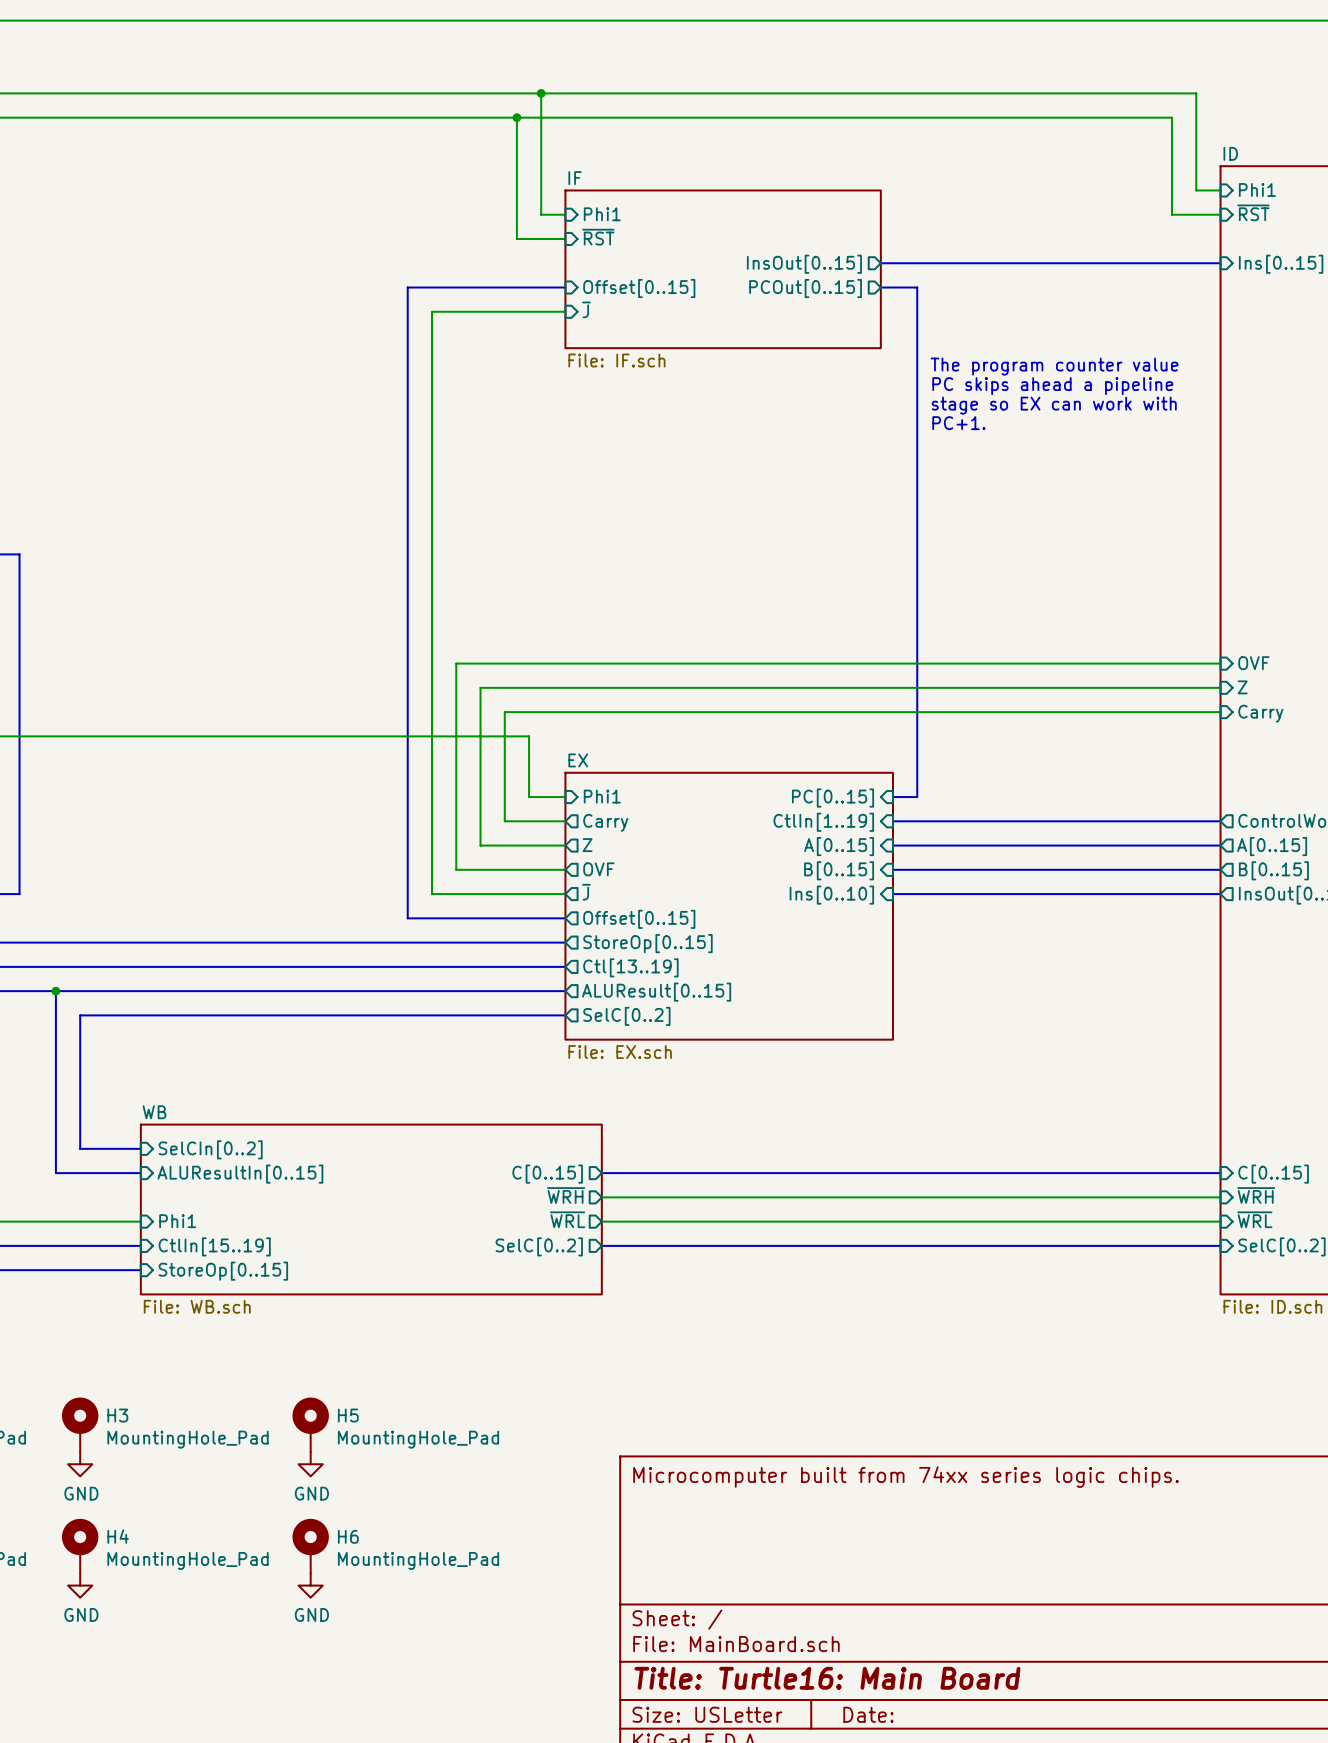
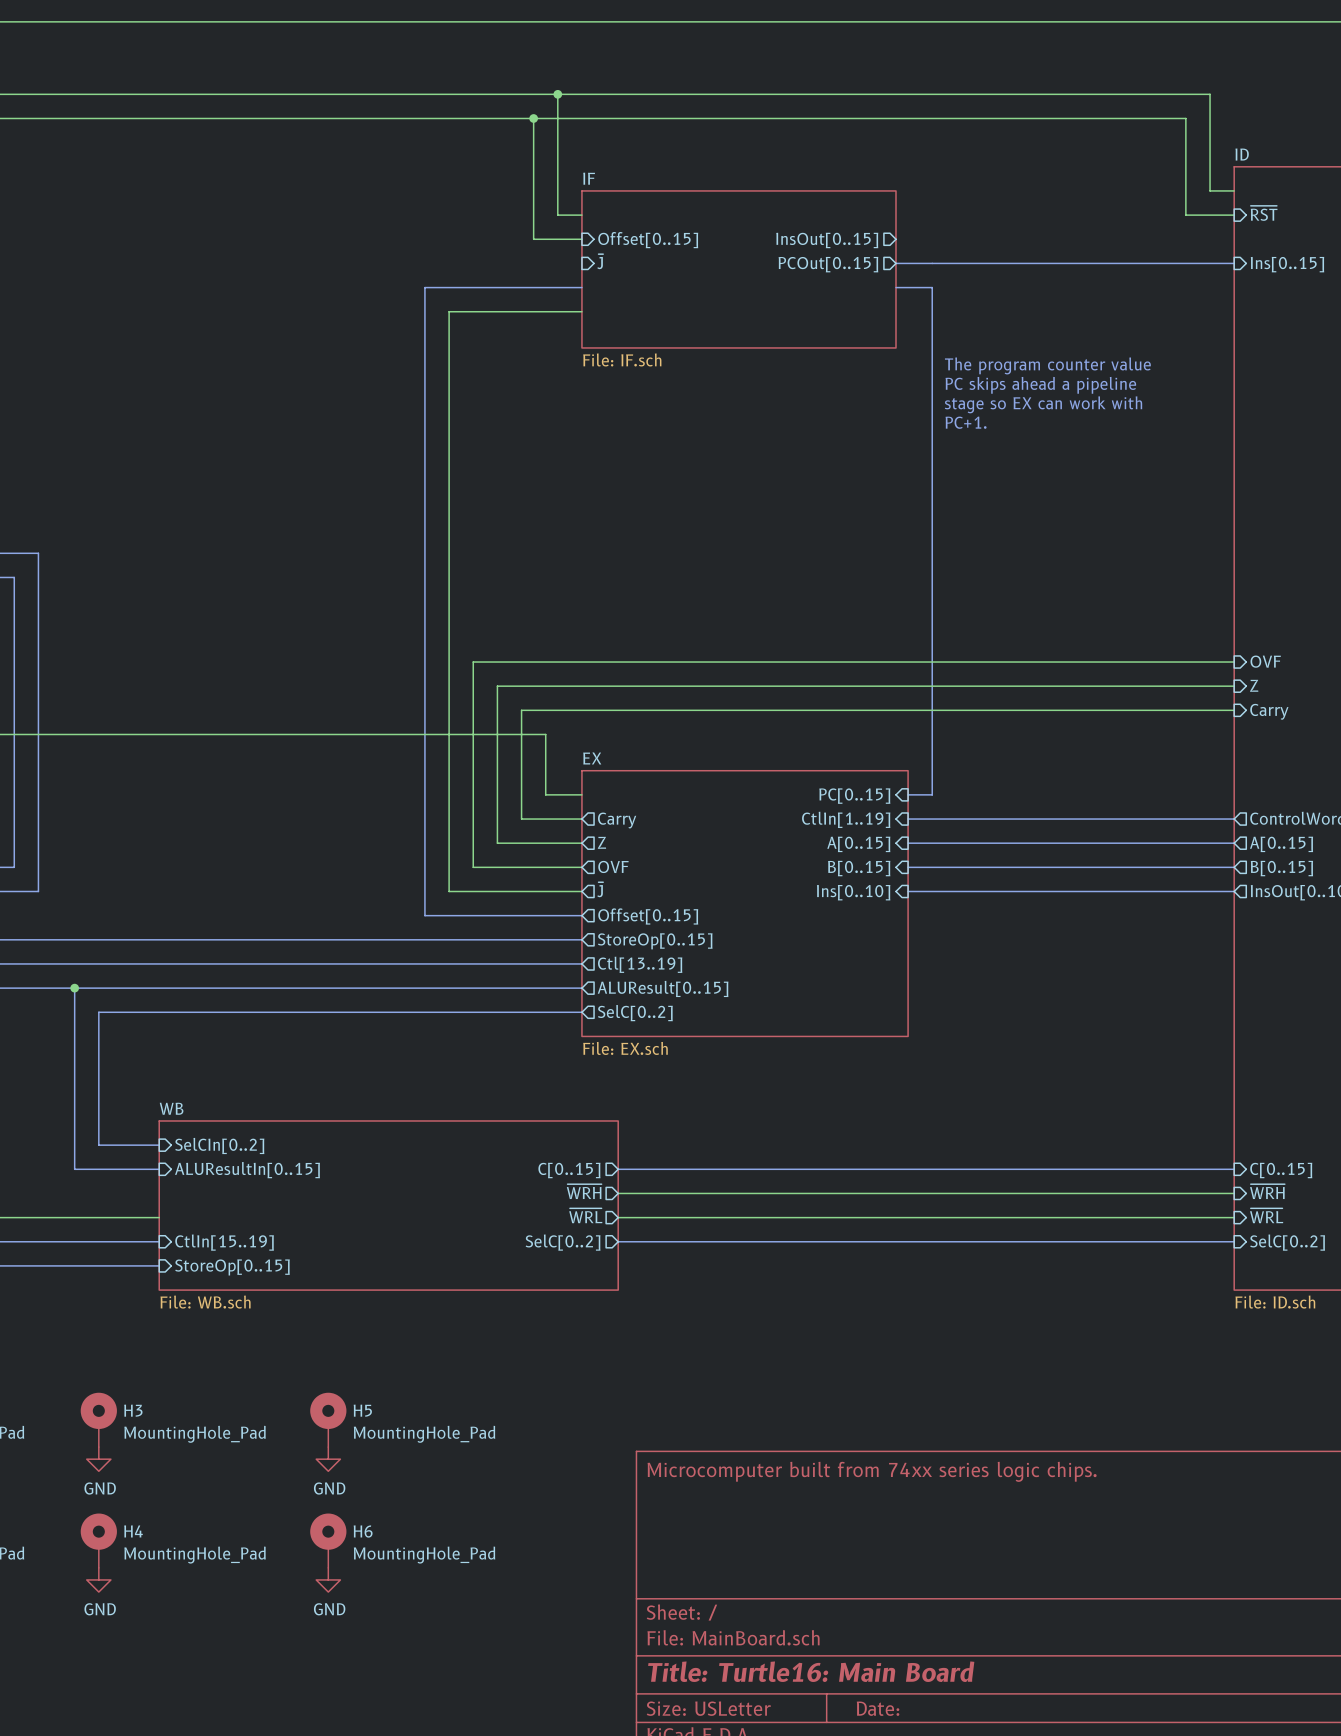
sheet pin: Phi1 (1257, 190) -> none
sheet pin: Phi1 (602, 214) -> none
sheet pin: ~{RST} (598, 237) -> Offset[0..15] (648, 240)
sheet pin: none -> InsOut[0..15] (827, 240)
sheet pin: InsOut[0..15] (804, 264) -> PCOut[0..15] (828, 264)
sheet pin: Offset[0..15] (639, 288) -> none
sheet pin: PCOut[0..15] (805, 288) -> none
sheet pin position: ~{J} (586, 309) -> ~{J} (600, 261)
sheet pin: Phi1 (602, 796) -> none
sheet pin: Phi1 (177, 1221) -> none

